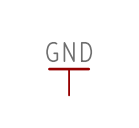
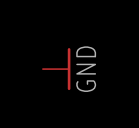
power symbol rotation: 0° (69, 69) -> 90° clockwise (69, 69)

